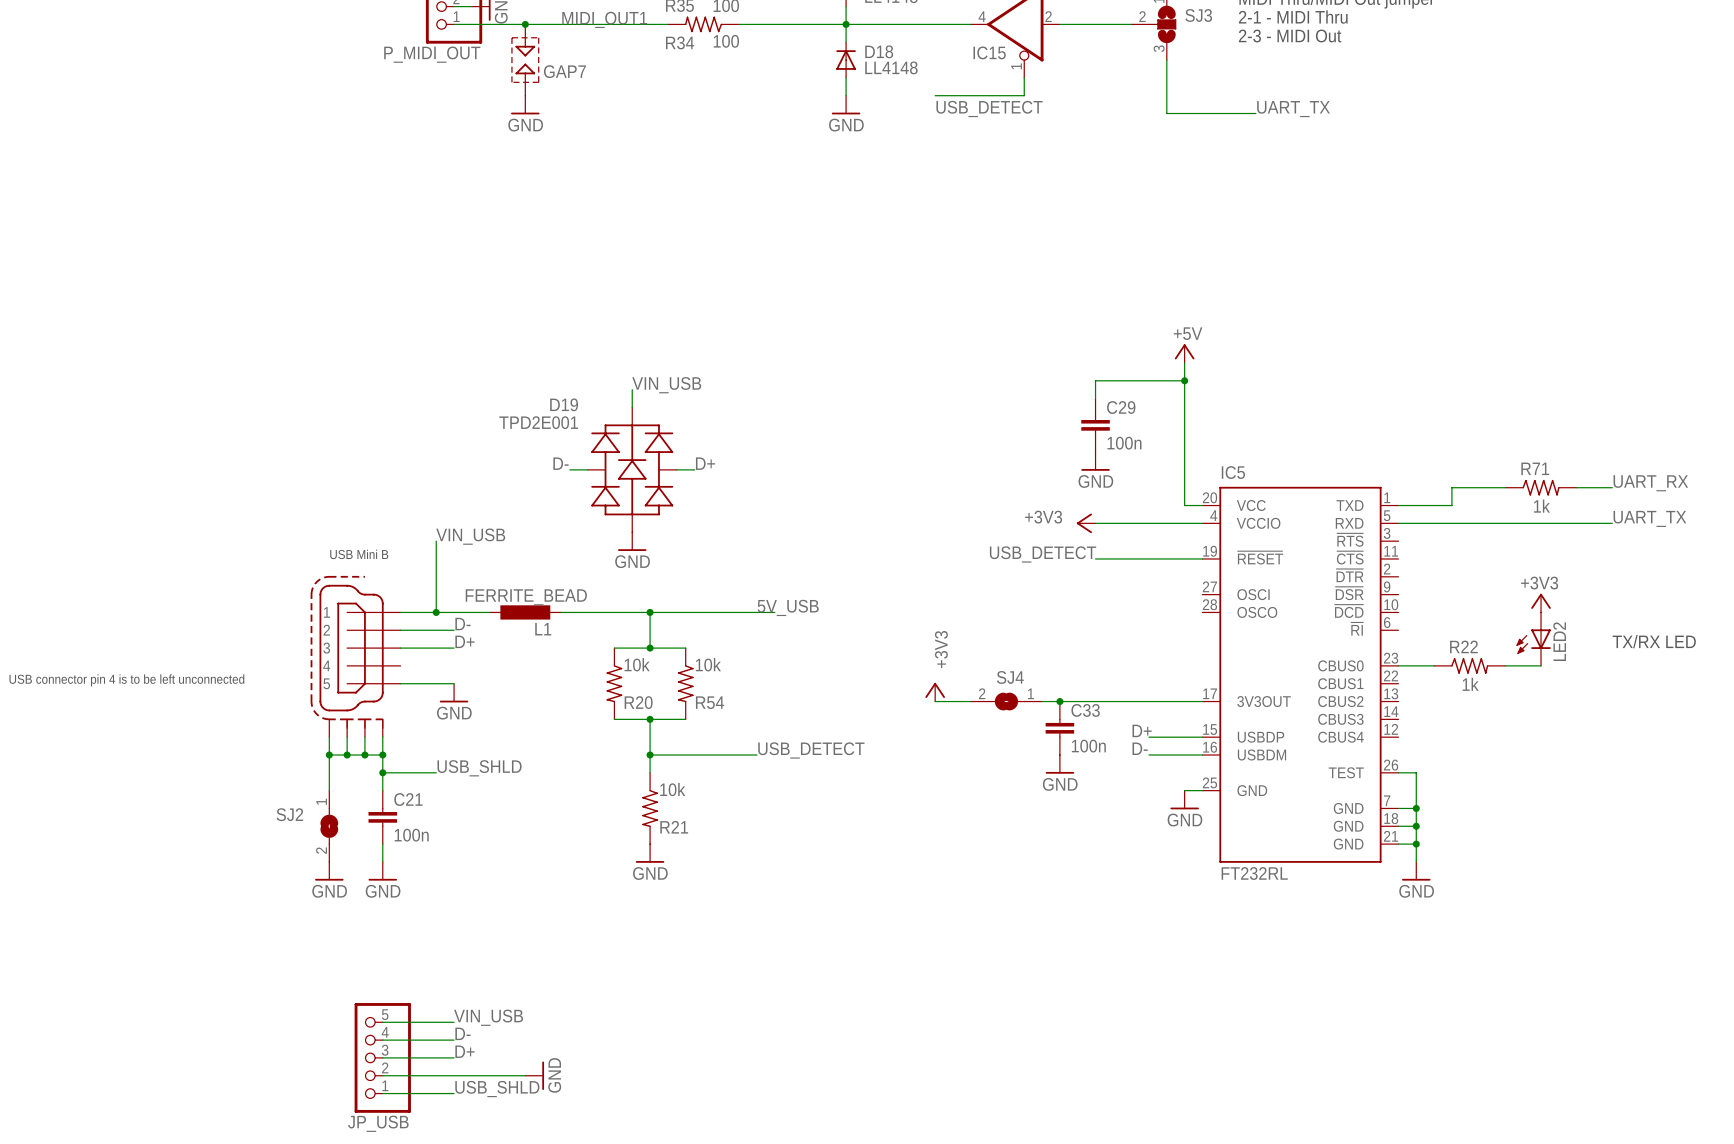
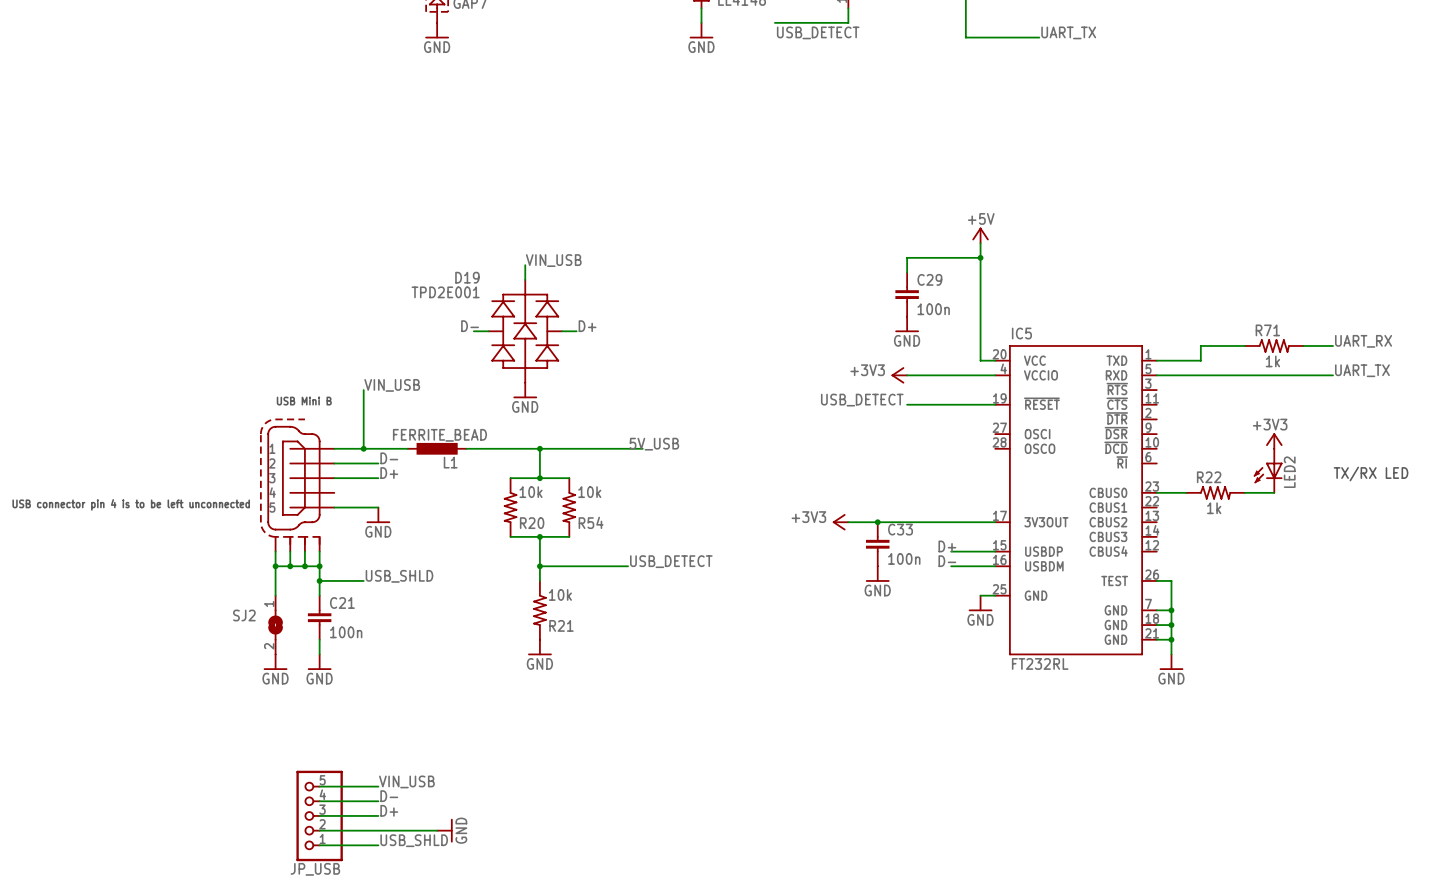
power symbol rotation: 0° (935, 690) -> 90° counterclockwise (839, 522)
power symbol position: +3V3 (935, 692) -> +3V3 (840, 522)
wire: (935, 701) (970, 701) -> none
SJ4: (1006, 701) -> none

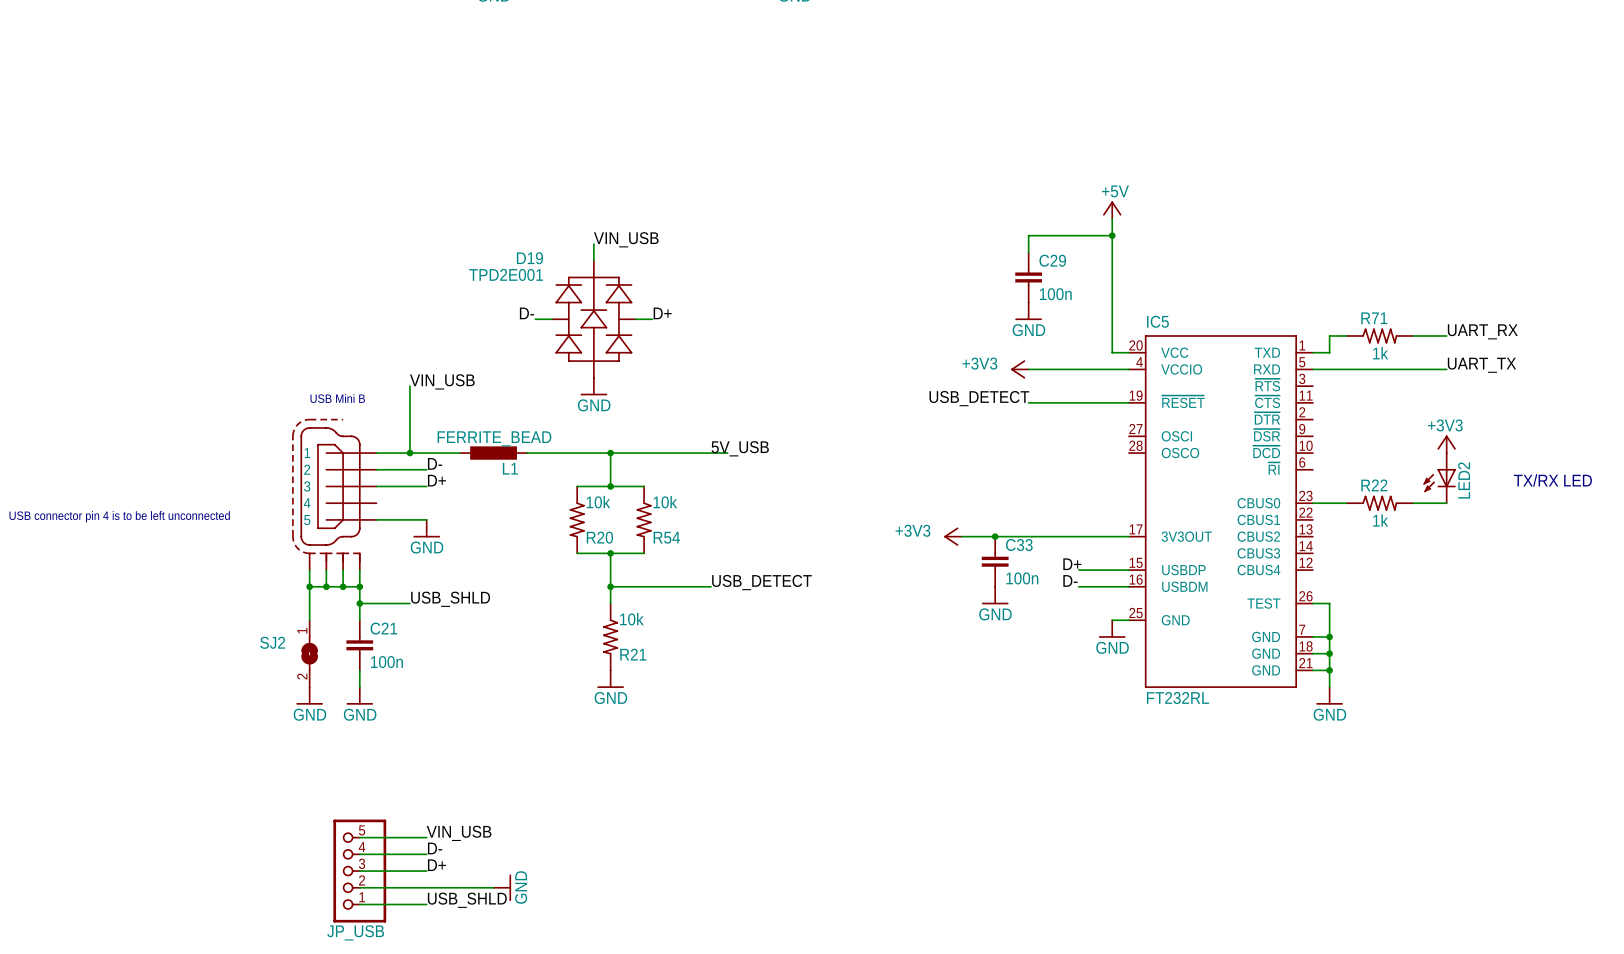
label position: UART_RX (1363, 341) -> UART_RX (1482, 331)
wire: (1244, 345) (1200, 345) (1200, 360) (1171, 360) -> (1346, 335) (1329, 335) (1329, 352)
R71 position: (1274, 345) -> (1379, 335)
label position: UART_TX (1362, 370) -> UART_TX (1481, 365)
wire: (1274, 375) (1333, 375) -> none

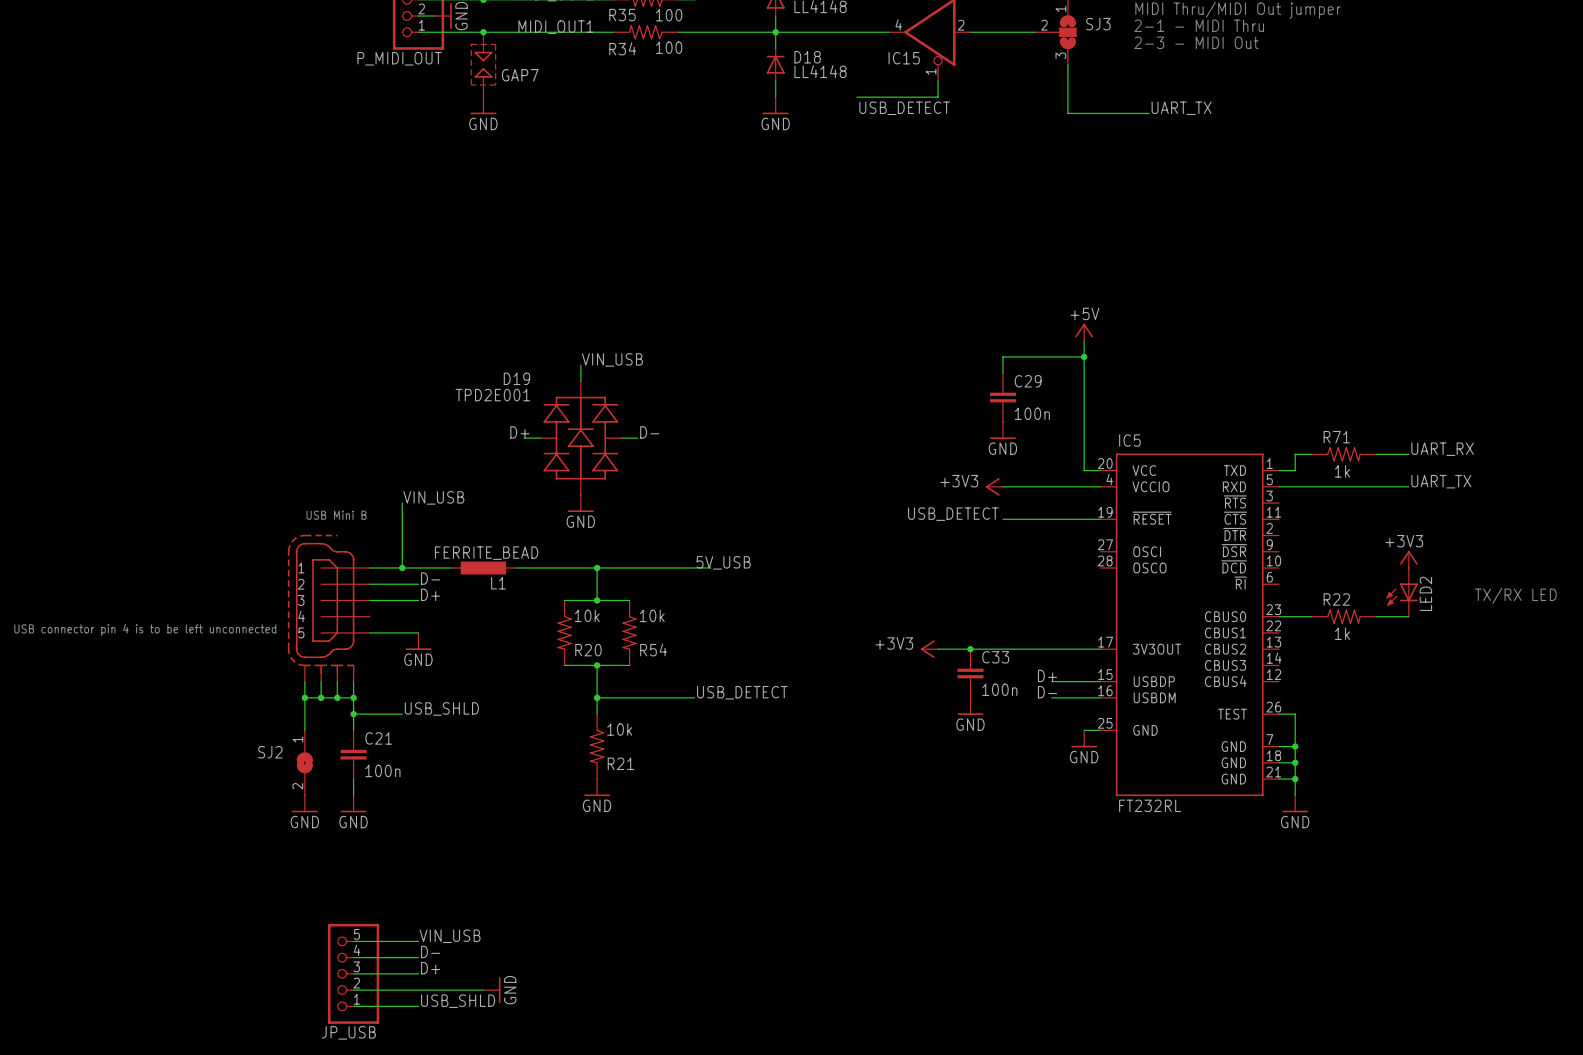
label: D- (527, 313) -> D+ (519, 432)
label: D+ (662, 313) -> D- (649, 432)

